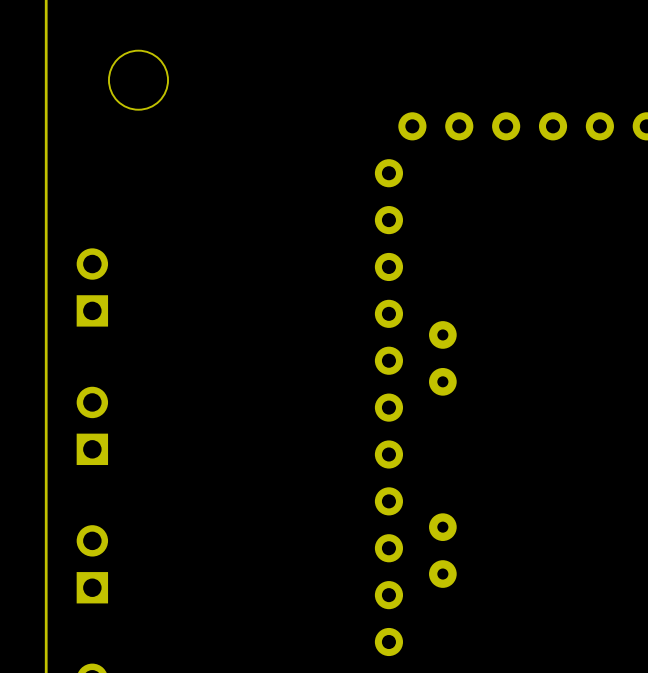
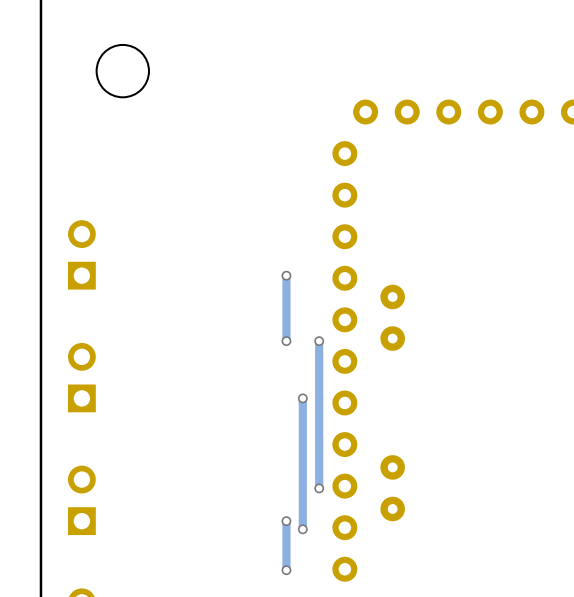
track: none -> (286, 275) (286, 341)
via: none -> (286, 275)
via: none -> (286, 341)
track: none -> (319, 341) (319, 488)
via: none -> (319, 341)
track: none -> (302, 398) (302, 529)
via: none -> (302, 398)
via: none -> (319, 488)
track: none -> (286, 521) (286, 570)
via: none -> (286, 521)
via: none -> (302, 529)
via: none -> (286, 570)

